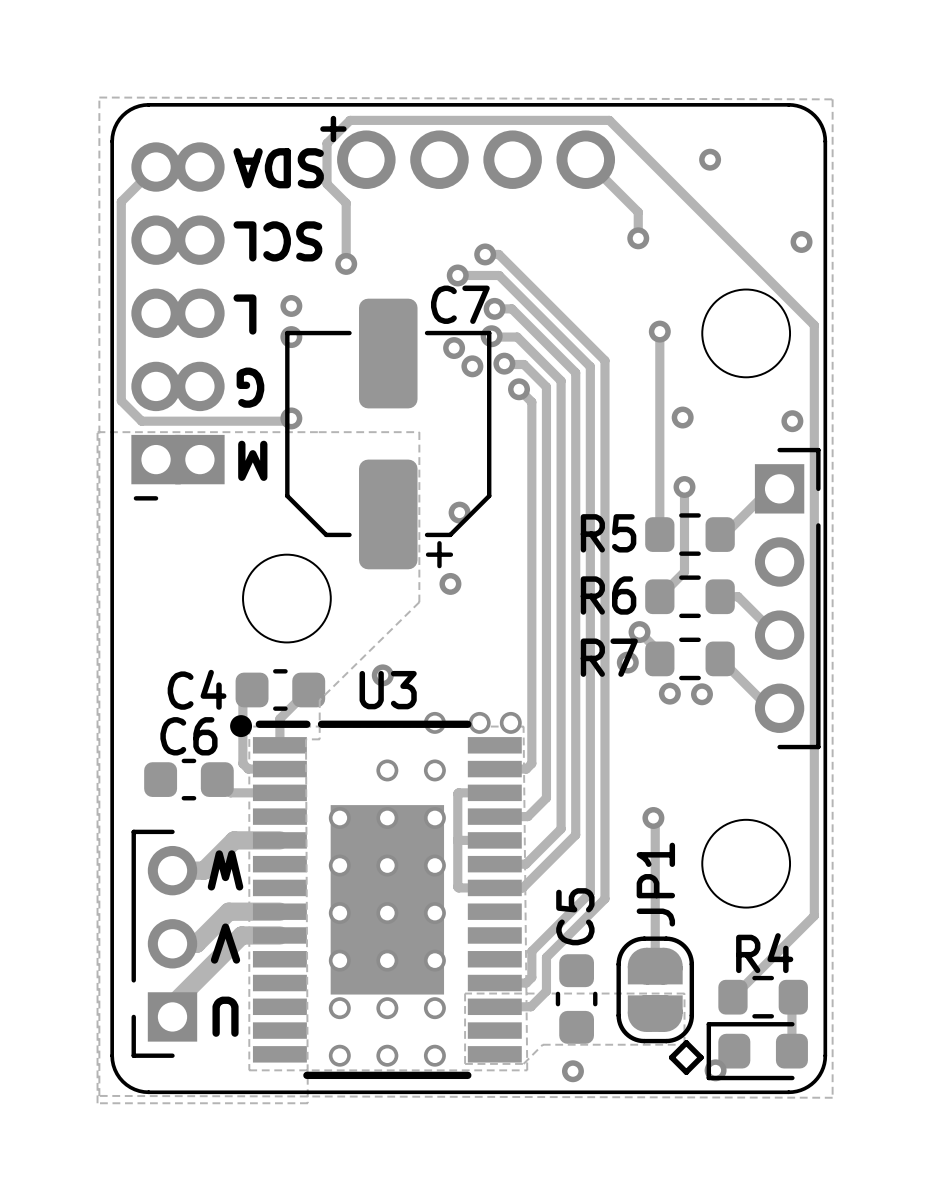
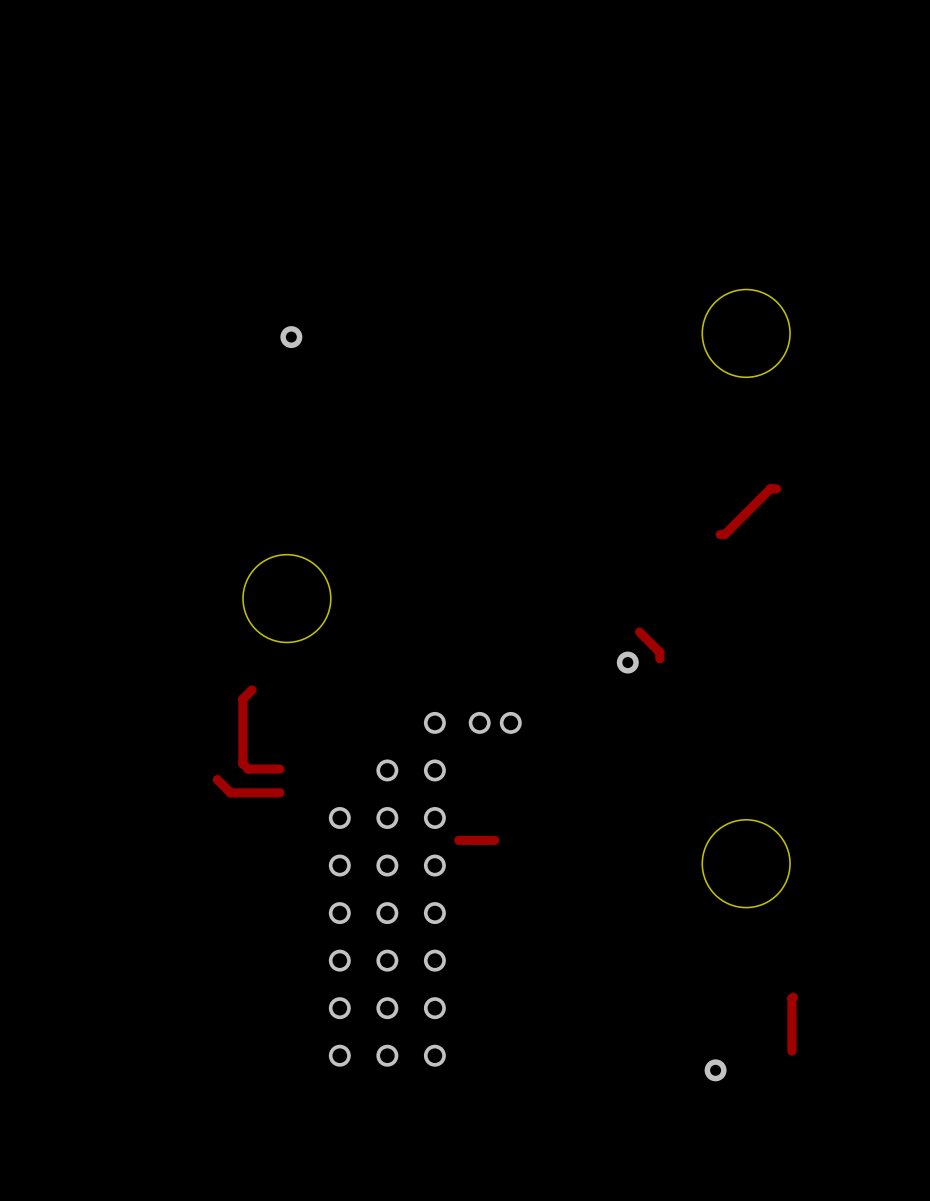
zone outline: (99, 97) (832, 99) (832, 1097) (99, 1095) (99, 97) -> none
board edge: (148, 104) (788, 104) (804, 108) (819, 121) (825, 141) (825, 1055) (821, 1071) (808, 1086) (788, 1092) (148, 1092) (134, 1089) (119, 1077) (114, 1069) (112, 1055) (112, 141) (114, 127) (122, 115) (134, 107) (148, 104) -> none
part: (476, 159) -> none
track: (585, 159) (638, 212) (638, 238) -> none
via: (710, 159) -> none
track: (156, 167) (121, 201) (121, 400) (141, 421) (288, 421) (291, 418) -> none
text: SDA (278, 168) -> none
via: (638, 238) -> none
text: SCL (277, 241) -> none
via: (801, 241) -> none
track: (485, 254) (498, 254) (604, 360) (604, 898) (546, 957) (546, 991) (530, 1006) (494, 1006) -> none
via: (485, 254) -> none
track: (346, 263) (346, 203) (327, 184) (327, 143) (350, 120) (609, 120) (814, 325) (814, 915) (732, 997) -> none
via: (346, 263) -> none
track: (457, 275) (499, 275) (590, 366) (590, 892) (531, 951) (531, 977) (526, 983) (494, 983) -> none
via: (457, 275) -> none
via: (291, 305) -> none
track: (494, 308) (511, 308) (575, 372) (575, 835) (522, 887) (458, 887) (457, 793) (494, 792) -> none
via: (494, 308) -> none
part: (199, 313) -> none
text: L (244, 314) -> none
part: (156, 321) -> none
track: (659, 331) (659, 534) -> none
via: (659, 331) -> none
track: (491, 336) (517, 337) (561, 380) (561, 828) (525, 864) (494, 864) -> none
via: (491, 336) -> none
via: (454, 348) -> none
track: (504, 363) (523, 364) (546, 386) (546, 797) (527, 816) (494, 816) -> none
via: (504, 363) -> none
via: (472, 366) -> none
text: G (250, 387) -> none
track: (519, 389) (531, 402) (531, 763) (526, 769) (494, 769) -> none
via: (519, 389) -> none
via: (682, 417) -> none
via: (291, 418) -> none
via: (792, 421) -> none
zone outline: (97, 432) (97, 1103) (307, 1103) (305, 739) (319, 739) (319, 700) (419, 602) (419, 432) (97, 432) -> none
C7: (388, 433) -> none
text: M (252, 460) -> none
track: (684, 487) (684, 572) (659, 596) -> none
via: (684, 487) -> none
via: (459, 512) -> none
R5: (689, 534) -> none
via: (450, 583) -> none
R6: (689, 596) -> none
track: (720, 596) (738, 596) (776, 635) -> none
part: (787, 598) -> none
via: (639, 632) -> none
R7: (689, 658) -> none
track: (720, 658) (769, 708) (776, 708) -> none
via: (382, 675) -> none
C4: (280, 689) -> none
track: (308, 689) (279, 718) (279, 745) -> none
via: (669, 693) -> none
via: (701, 694) -> none
zone outline: (249, 726) (523, 726) (527, 1070) (249, 1070) (249, 726) -> none
C6: (188, 779) -> none
track: (653, 817) (655, 819) (655, 966) -> none
via: (653, 817) -> none
track: (279, 840) (234, 840) (203, 870) (172, 870) -> none
text: W (225, 870) -> none
U3: (375, 897) -> none
track: (279, 911) (228, 911) (196, 943) (172, 943) -> none
track: (279, 935) (241, 935) (172, 1004) (172, 1016) -> none
part: (164, 943) -> none
text: V (225, 943) -> none
JP1: (655, 989) -> none
zone outline: (465, 993) (465, 1063) (523, 1063) (542, 1044) (684, 1044) (684, 993) (465, 993) -> none
R4: (763, 997) -> none
C5: (576, 999) -> none
text: U (225, 1016) -> none
line: (686, 1042) (700, 1057) (686, 1072) (671, 1057) (686, 1042) -> none
part: (757, 1051) -> none
via: (572, 1071) -> none

